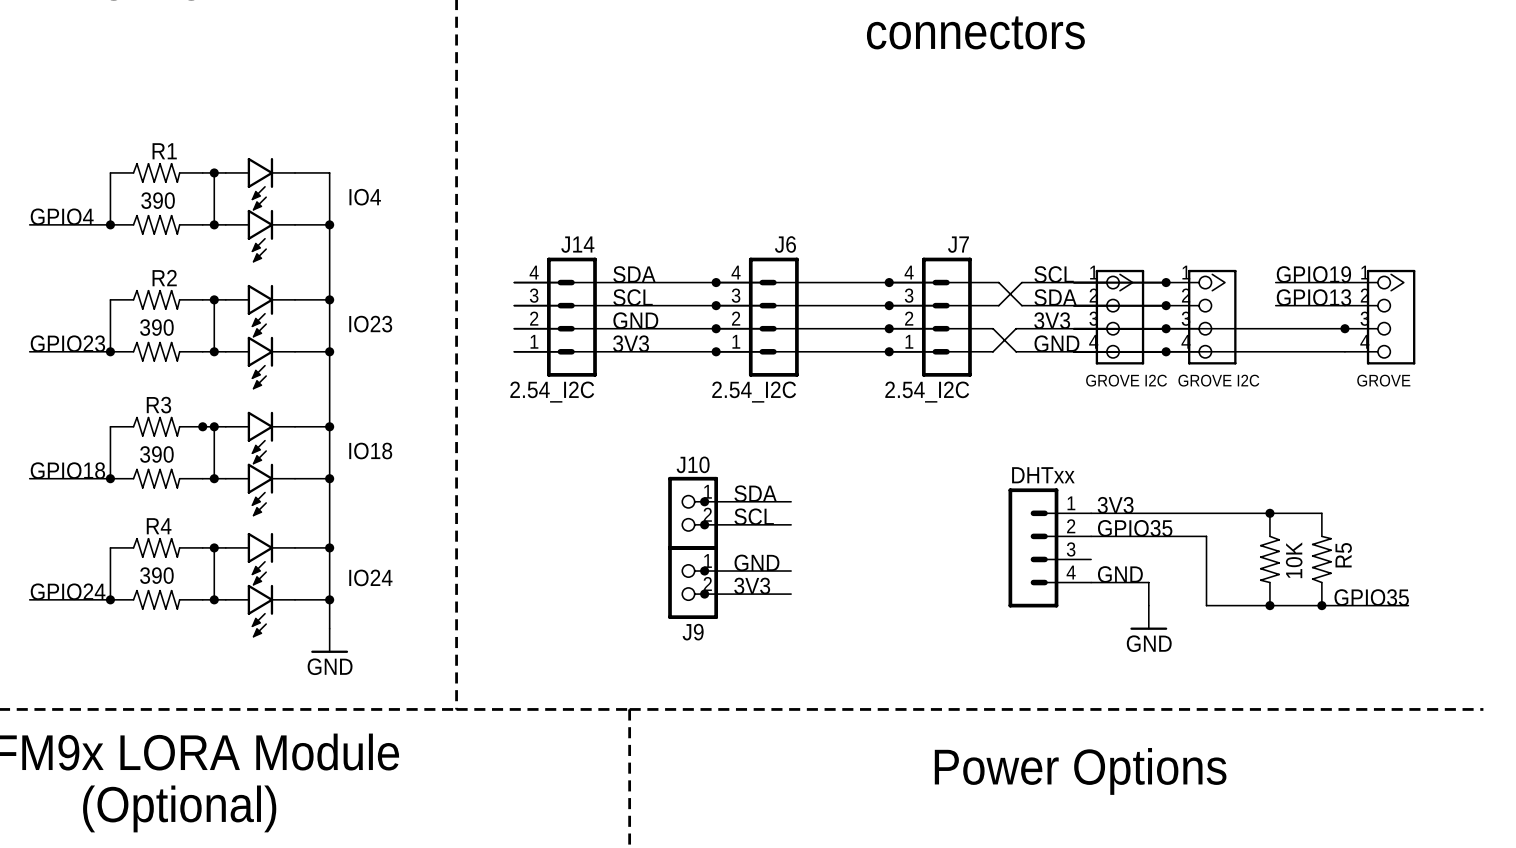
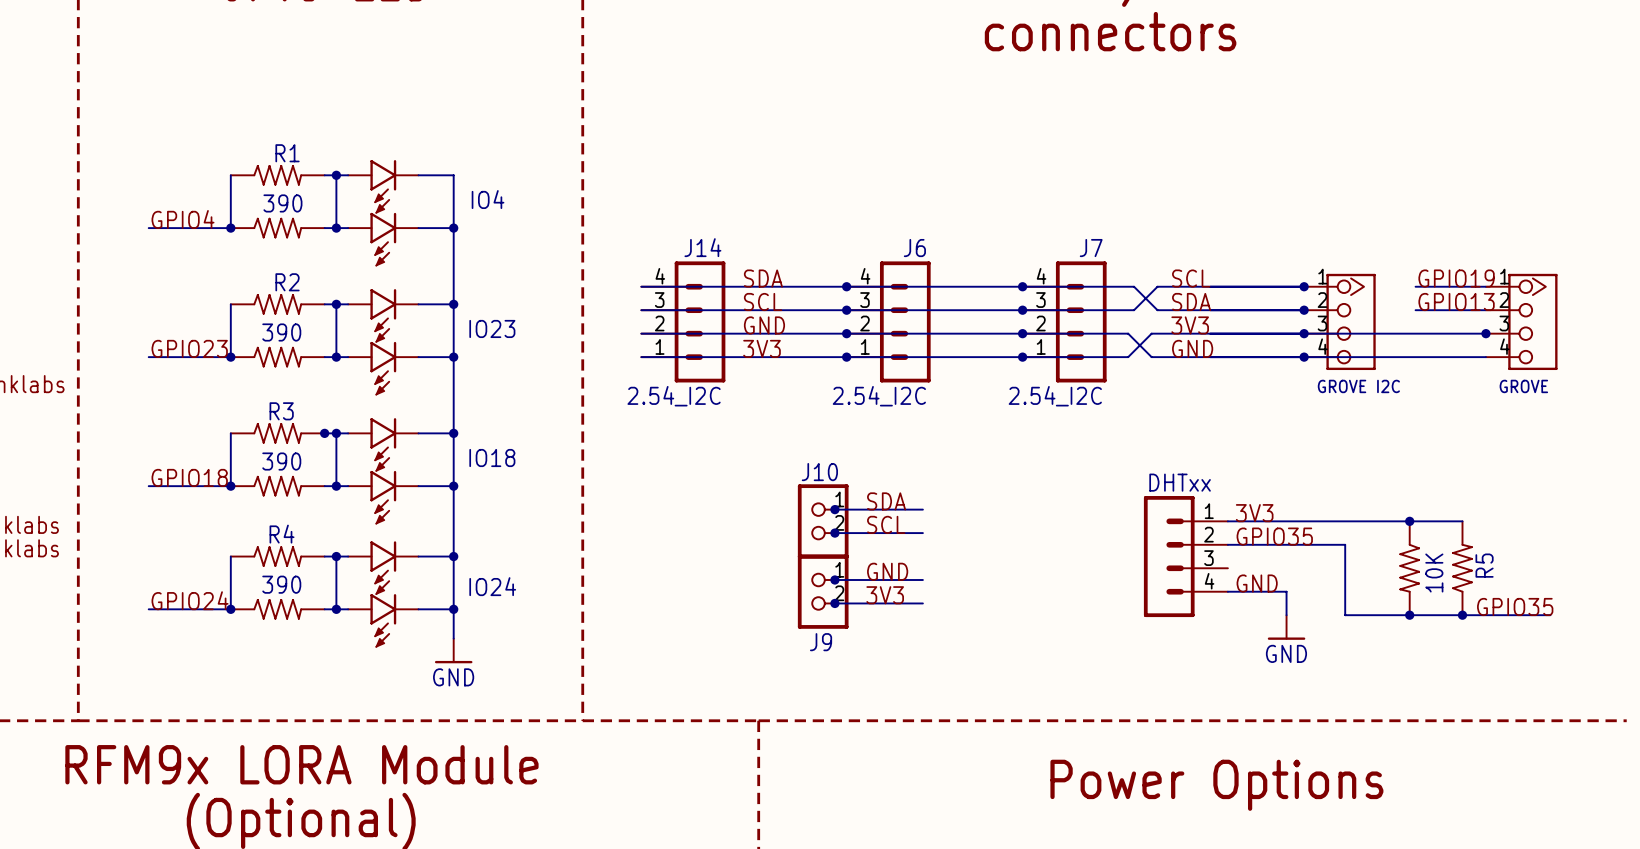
part: GROVE I2C (1109, 317) -> none

